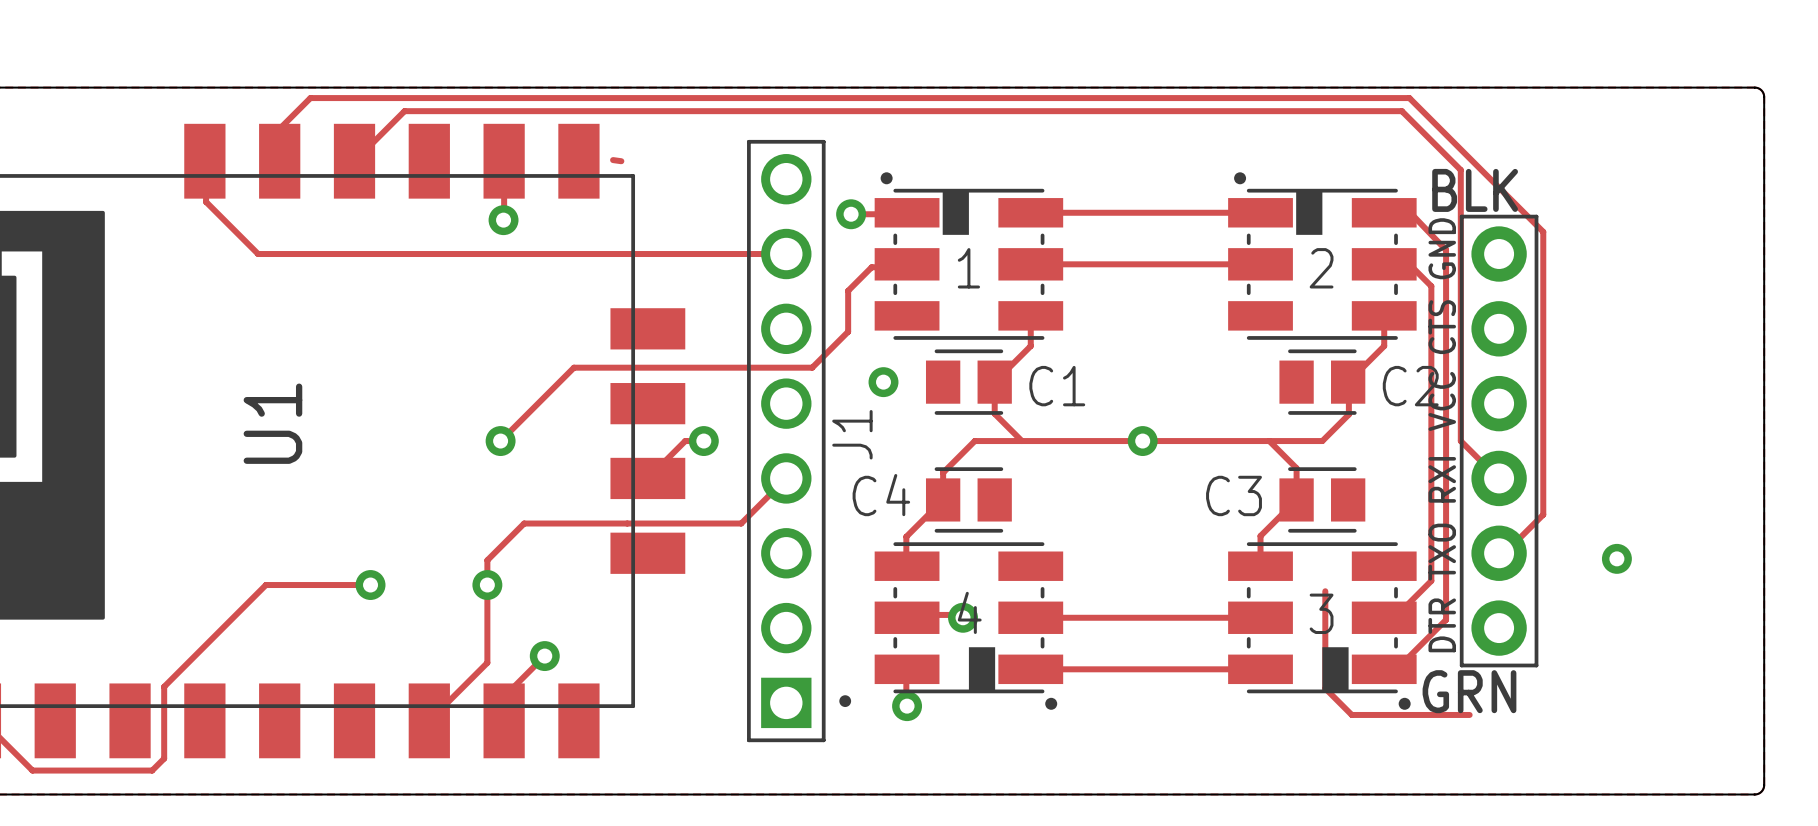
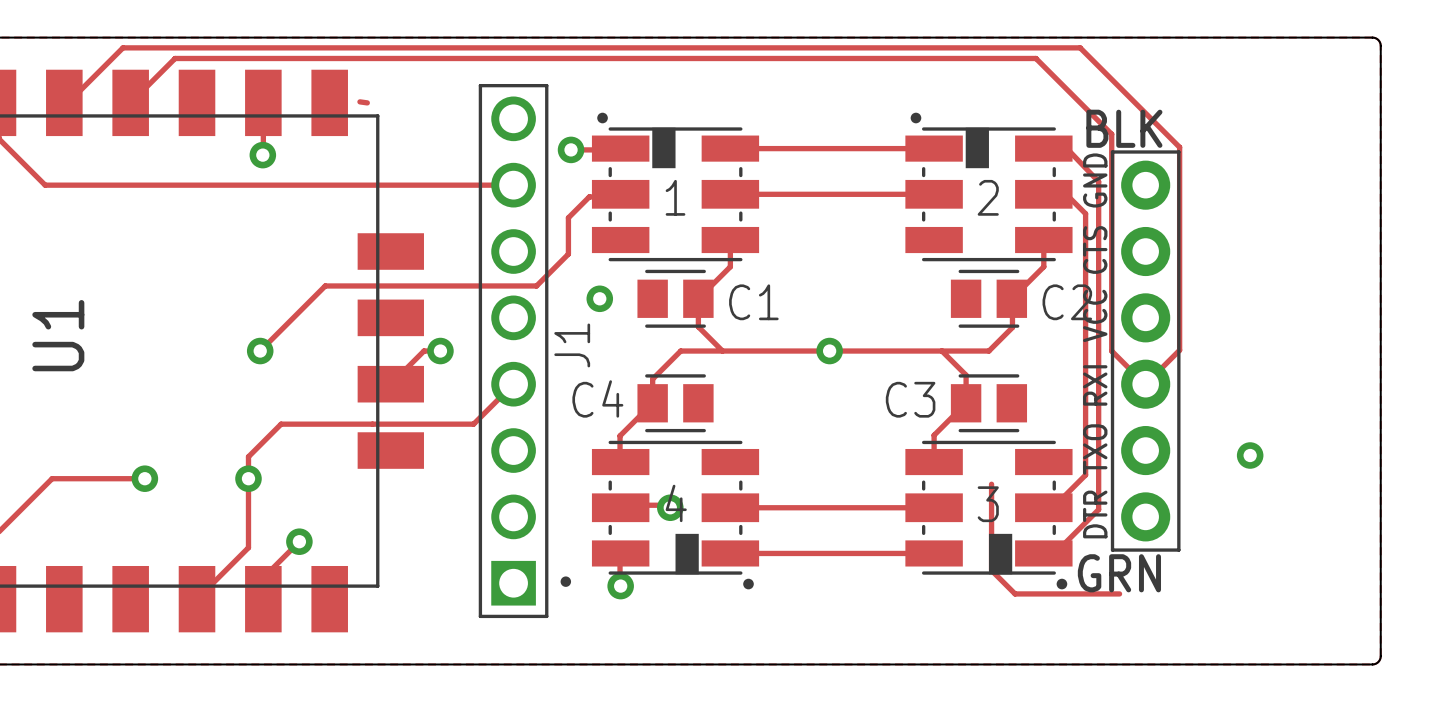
track: (1375, 111) (1401, 111) (1460, 170) (1460, 196) -> (1035, 58) (1111, 134)
track: (279, 161) (279, 128) (310, 98) (1409, 98) (1543, 231) (1543, 514) (1504, 553) (1499, 553) -> (64, 102) (67, 102) (122, 47) (1080, 47) (1179, 147) (1179, 350) (1145, 384)

